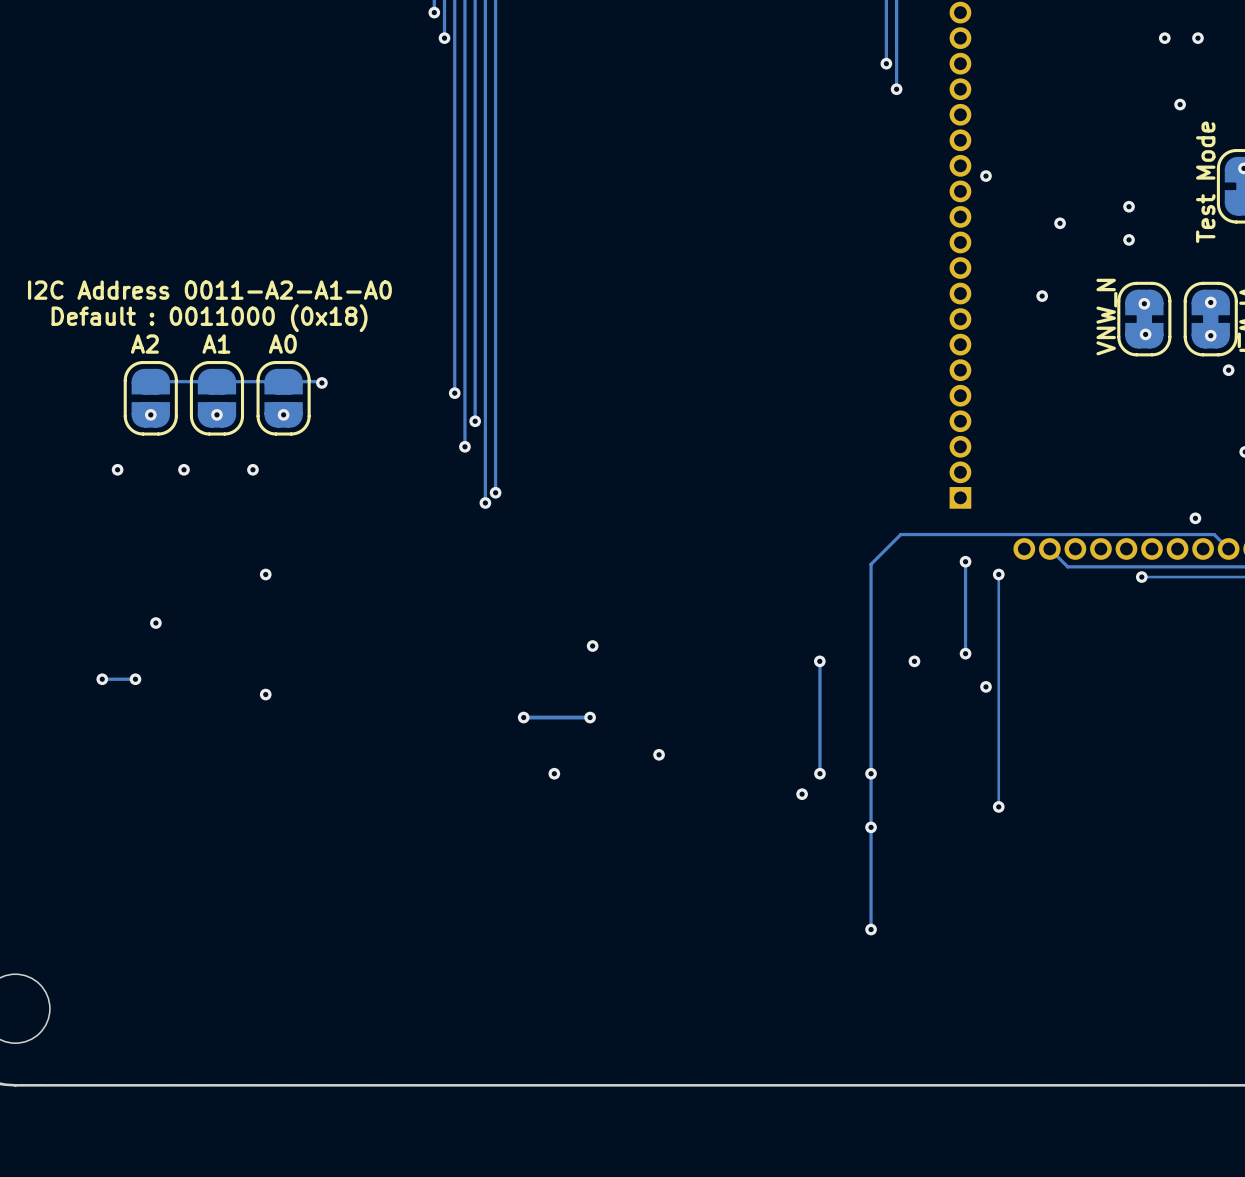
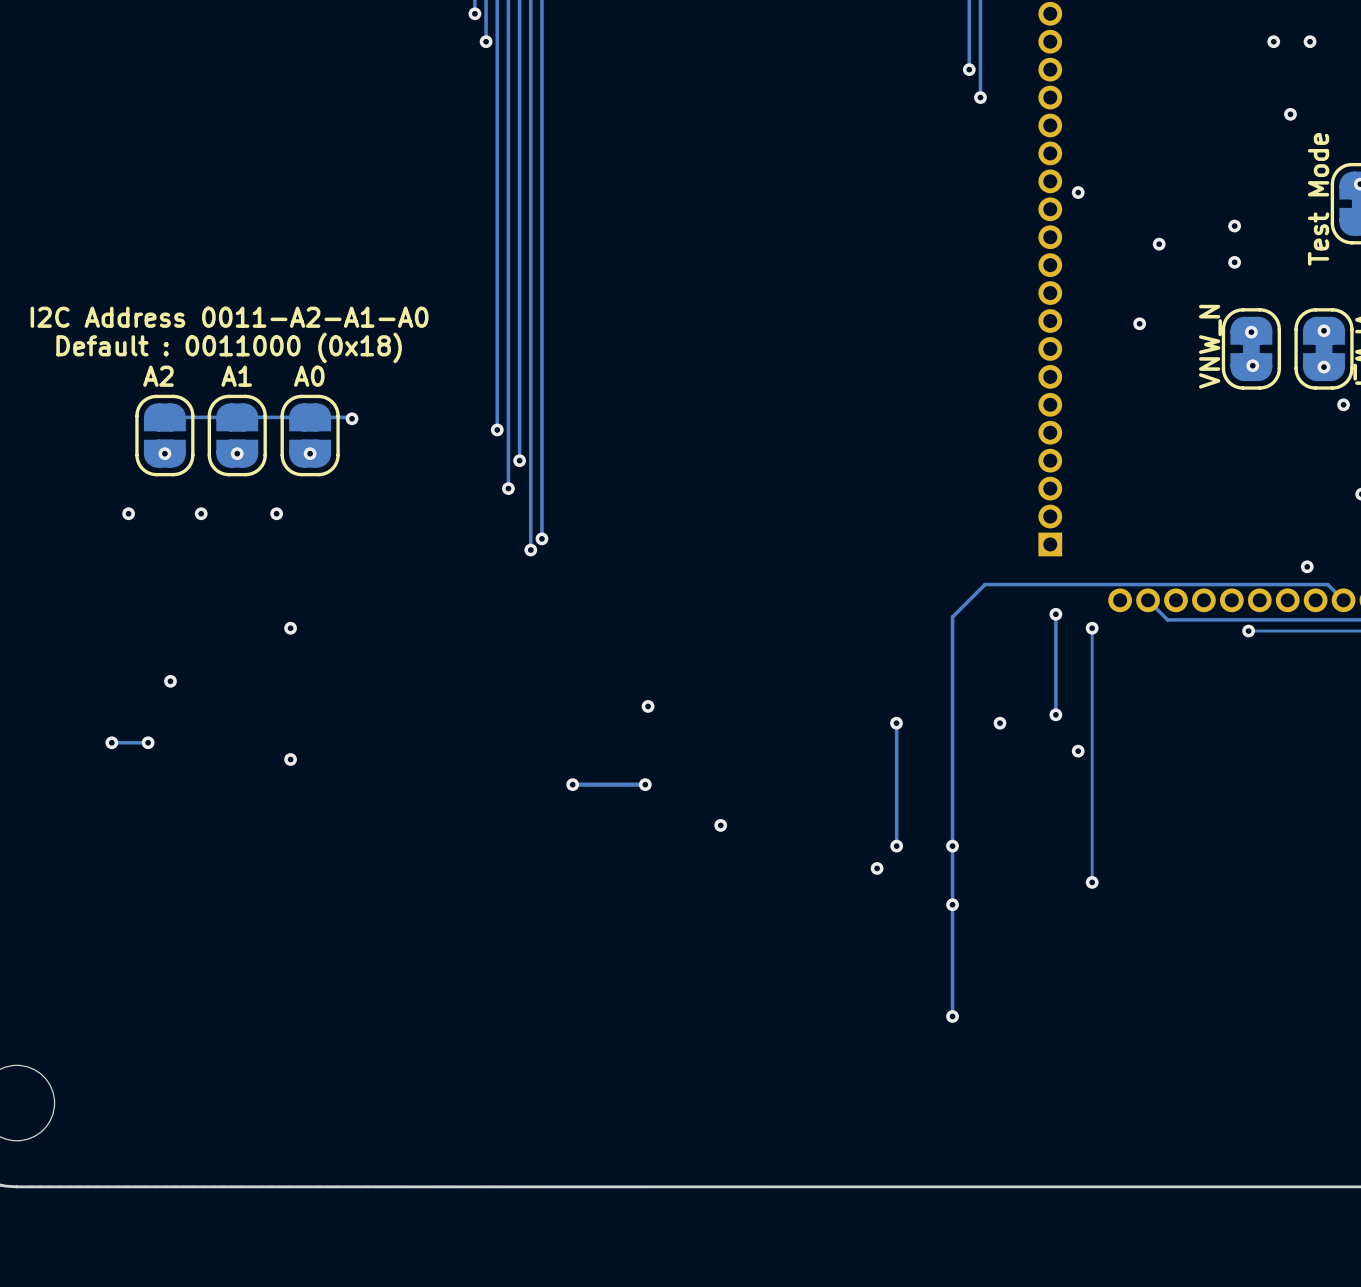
via: (554, 773) -> none

